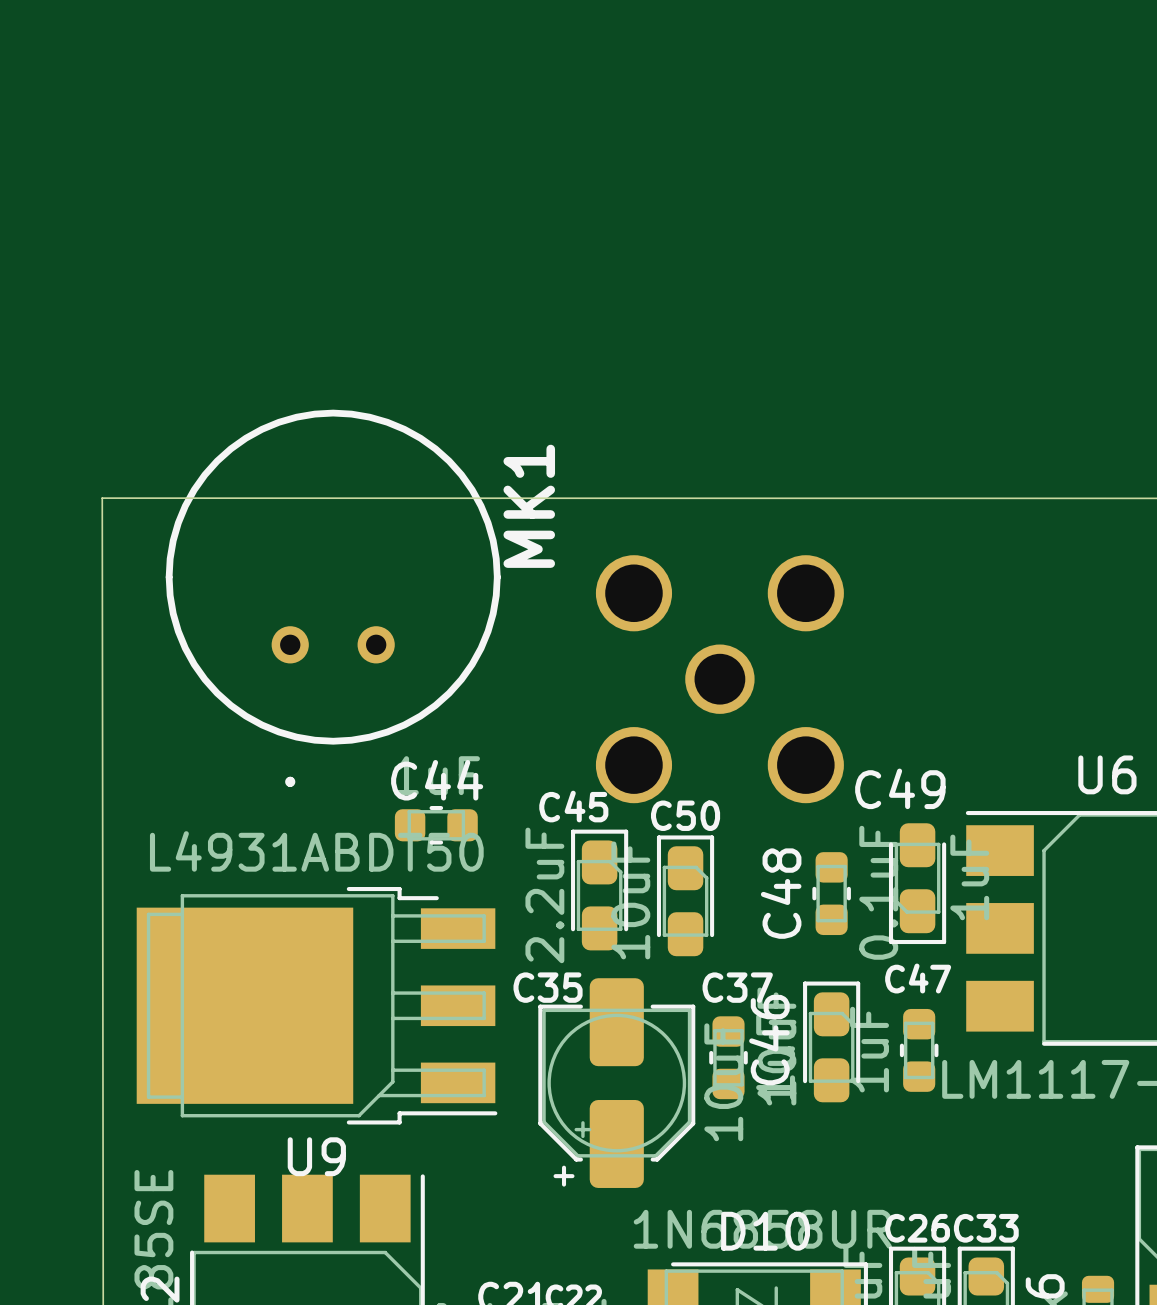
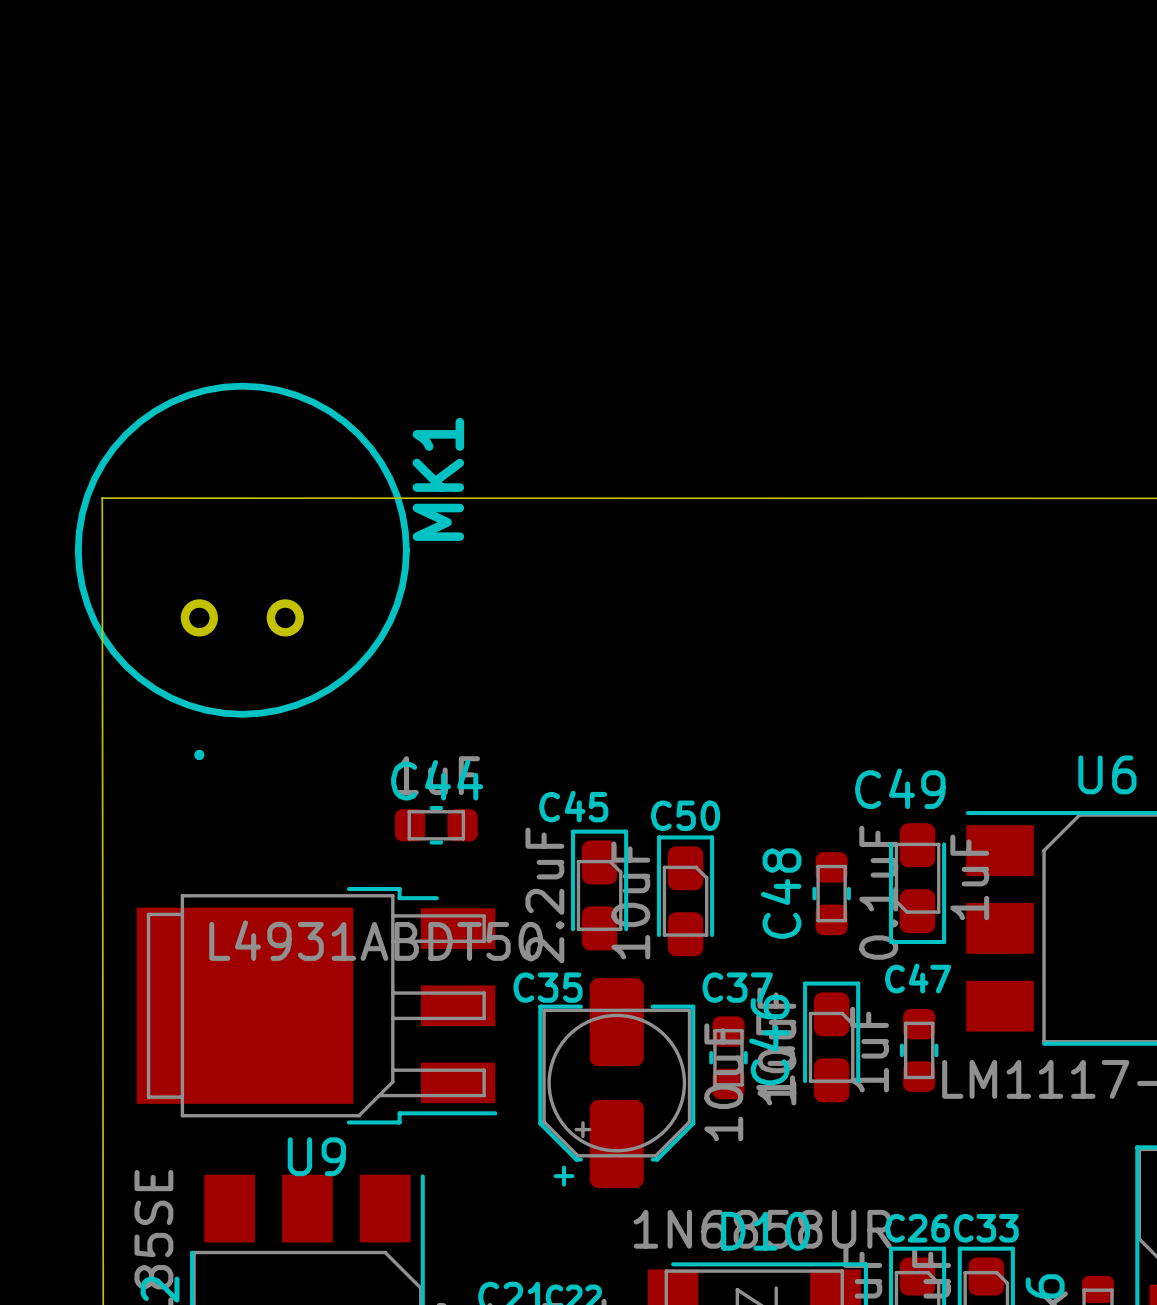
MK1 position: (333, 598) -> (242, 571)
part: (719, 679) -> none
U9 value position: L4931ABDT50 (316, 851) -> L4931ABDT50 (376, 940)

